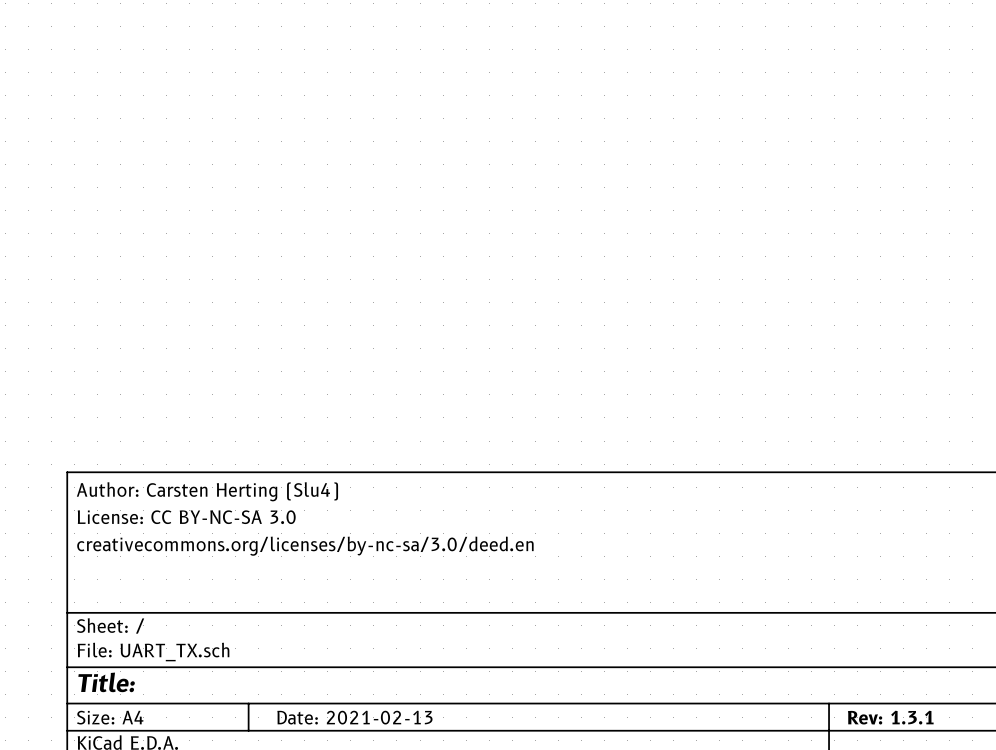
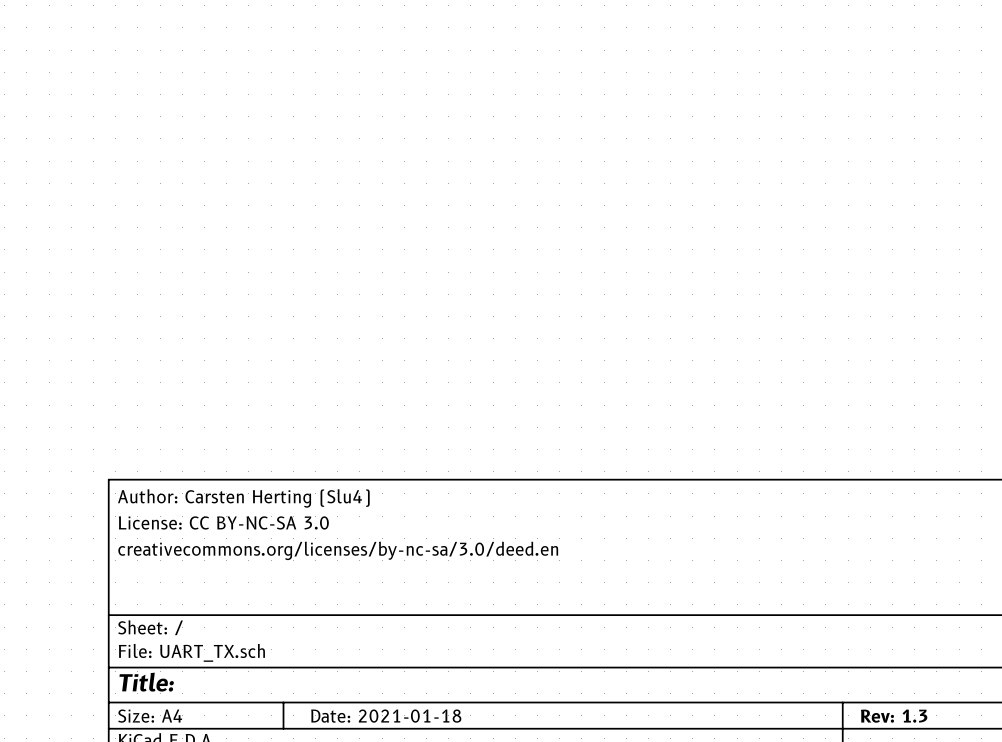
title block: Date: 2021-02-13 (354, 717) -> Date: 2021-01-18 (386, 716)
title block: Rev: 1.3.1 (890, 717) -> Rev: 1.3 (894, 716)

